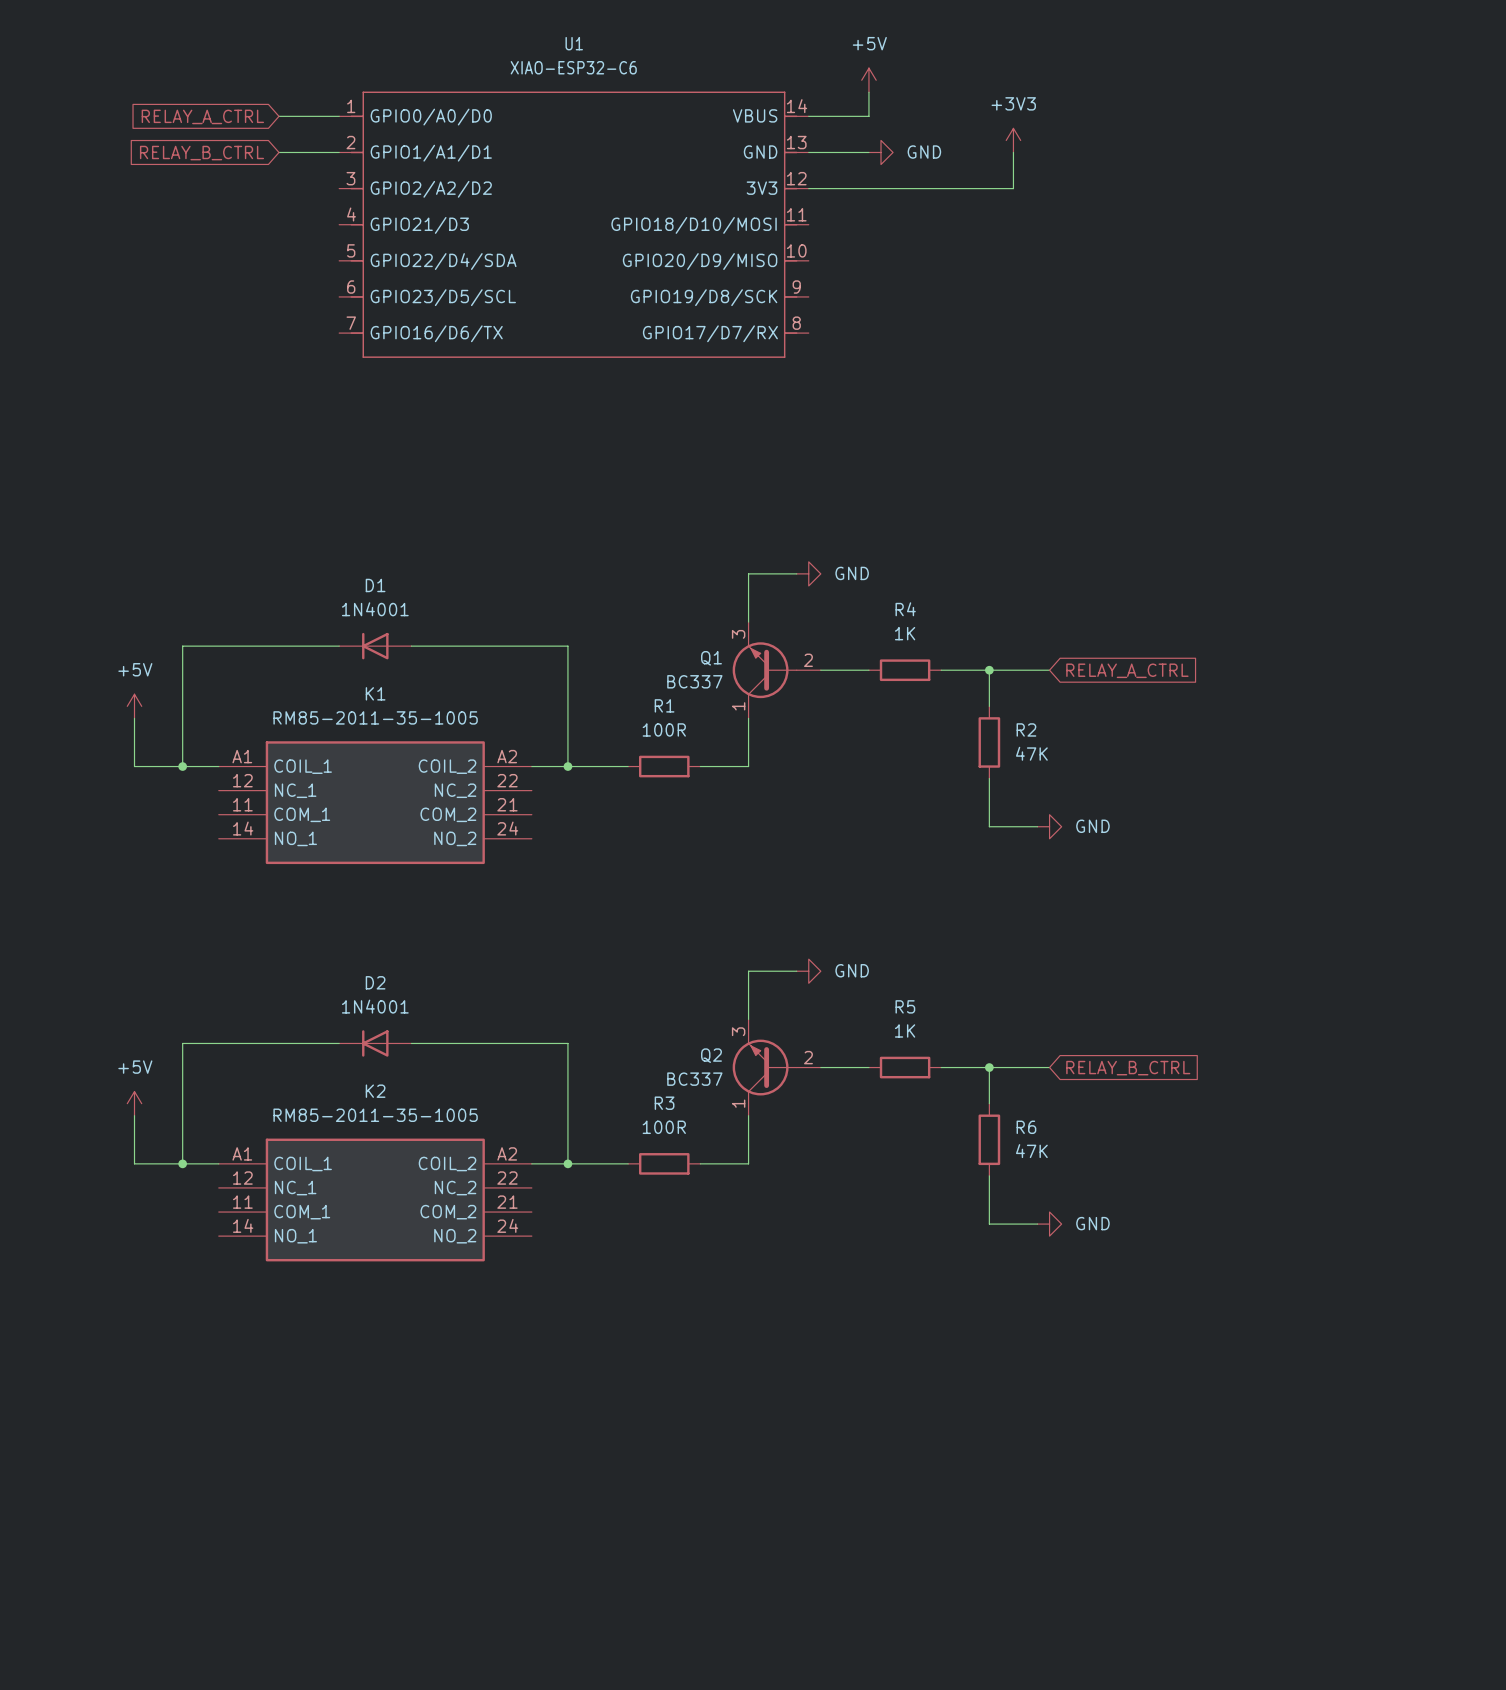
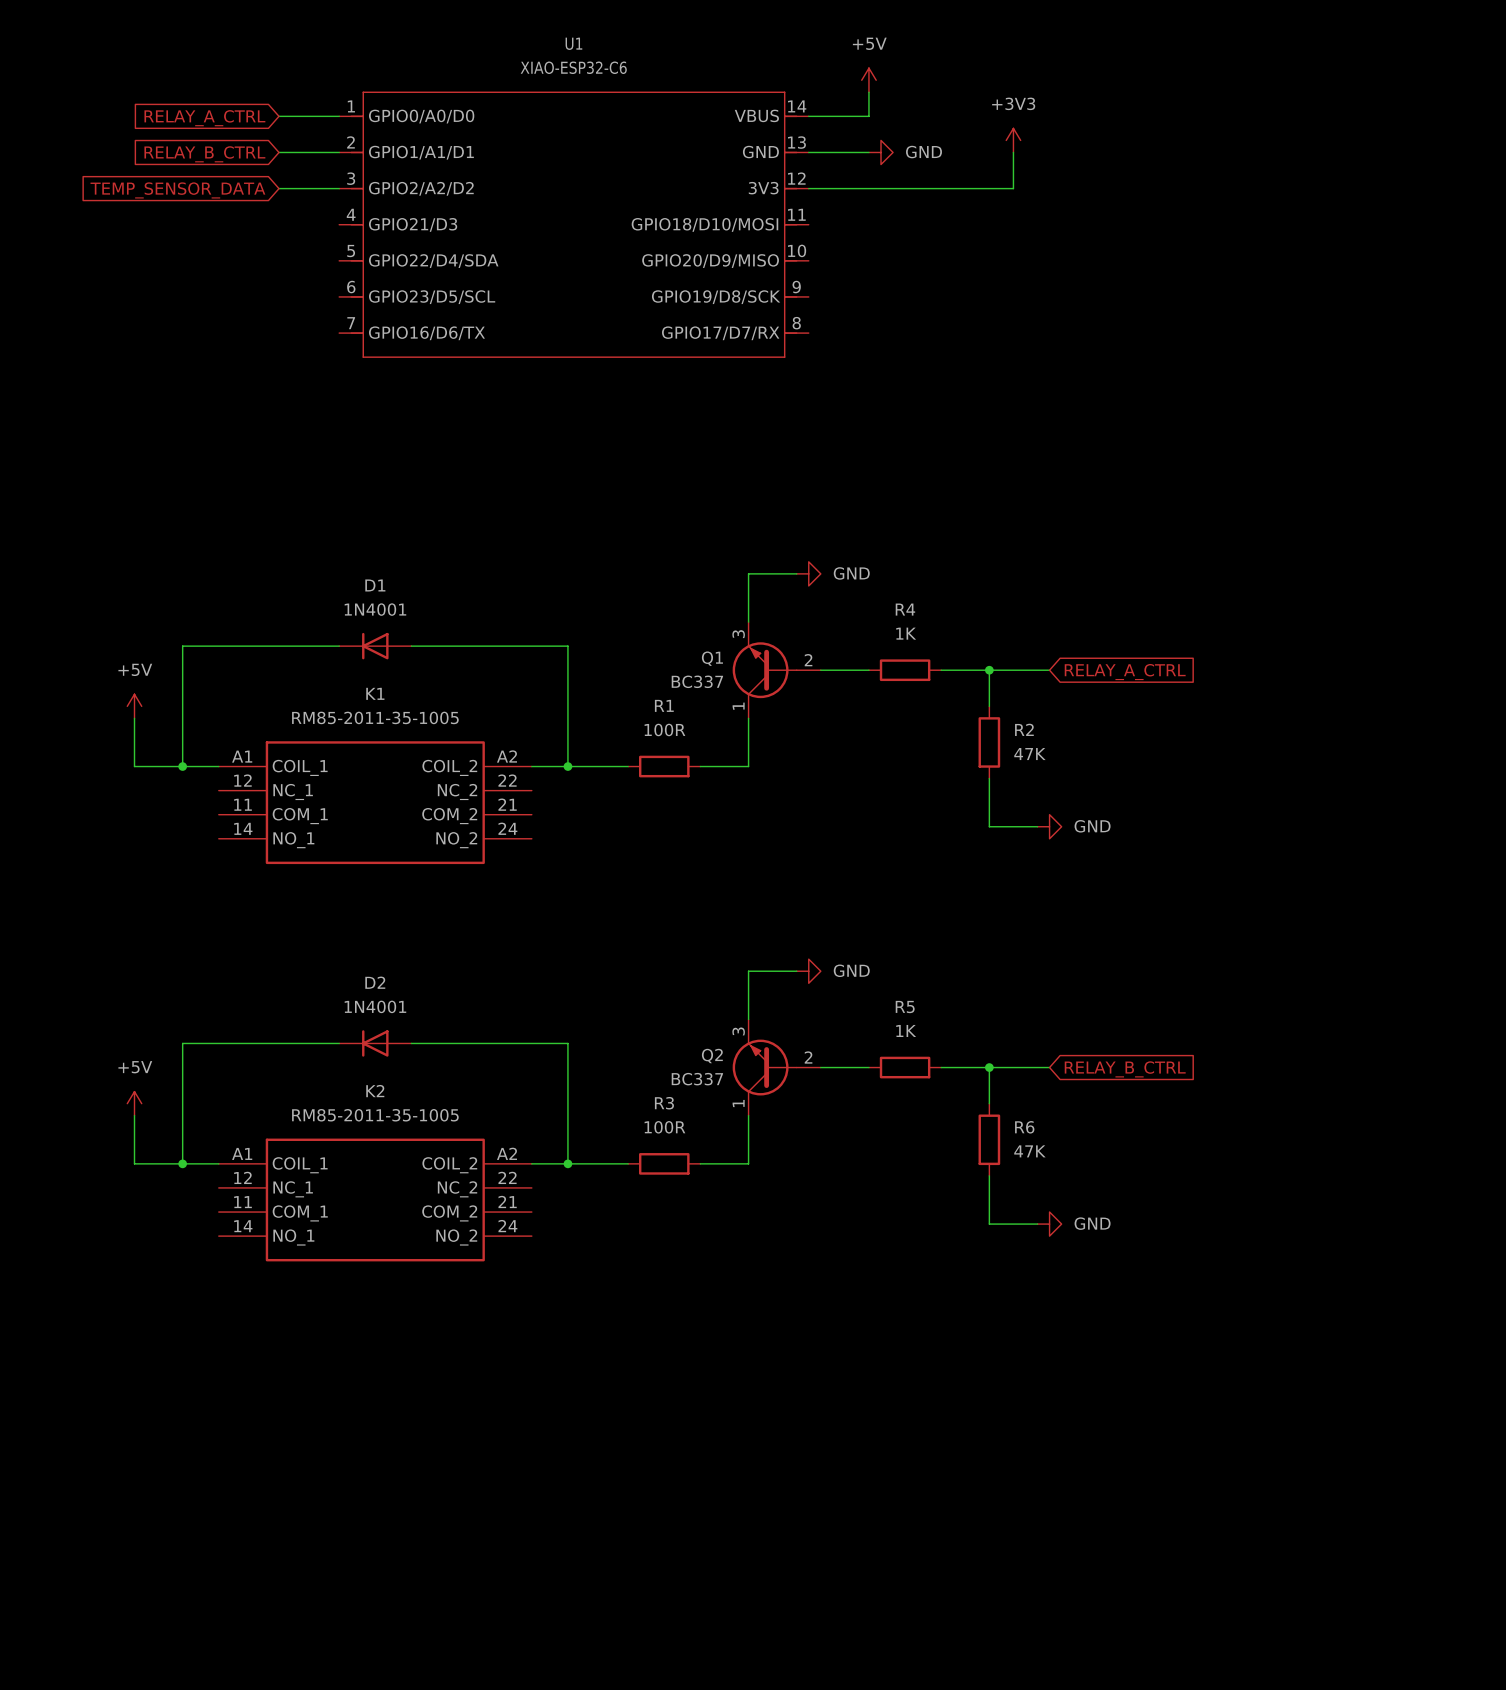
wire: none -> (278, 188) (339, 188)
global label: none -> TEMP_SENSOR_DATA (177, 190)

